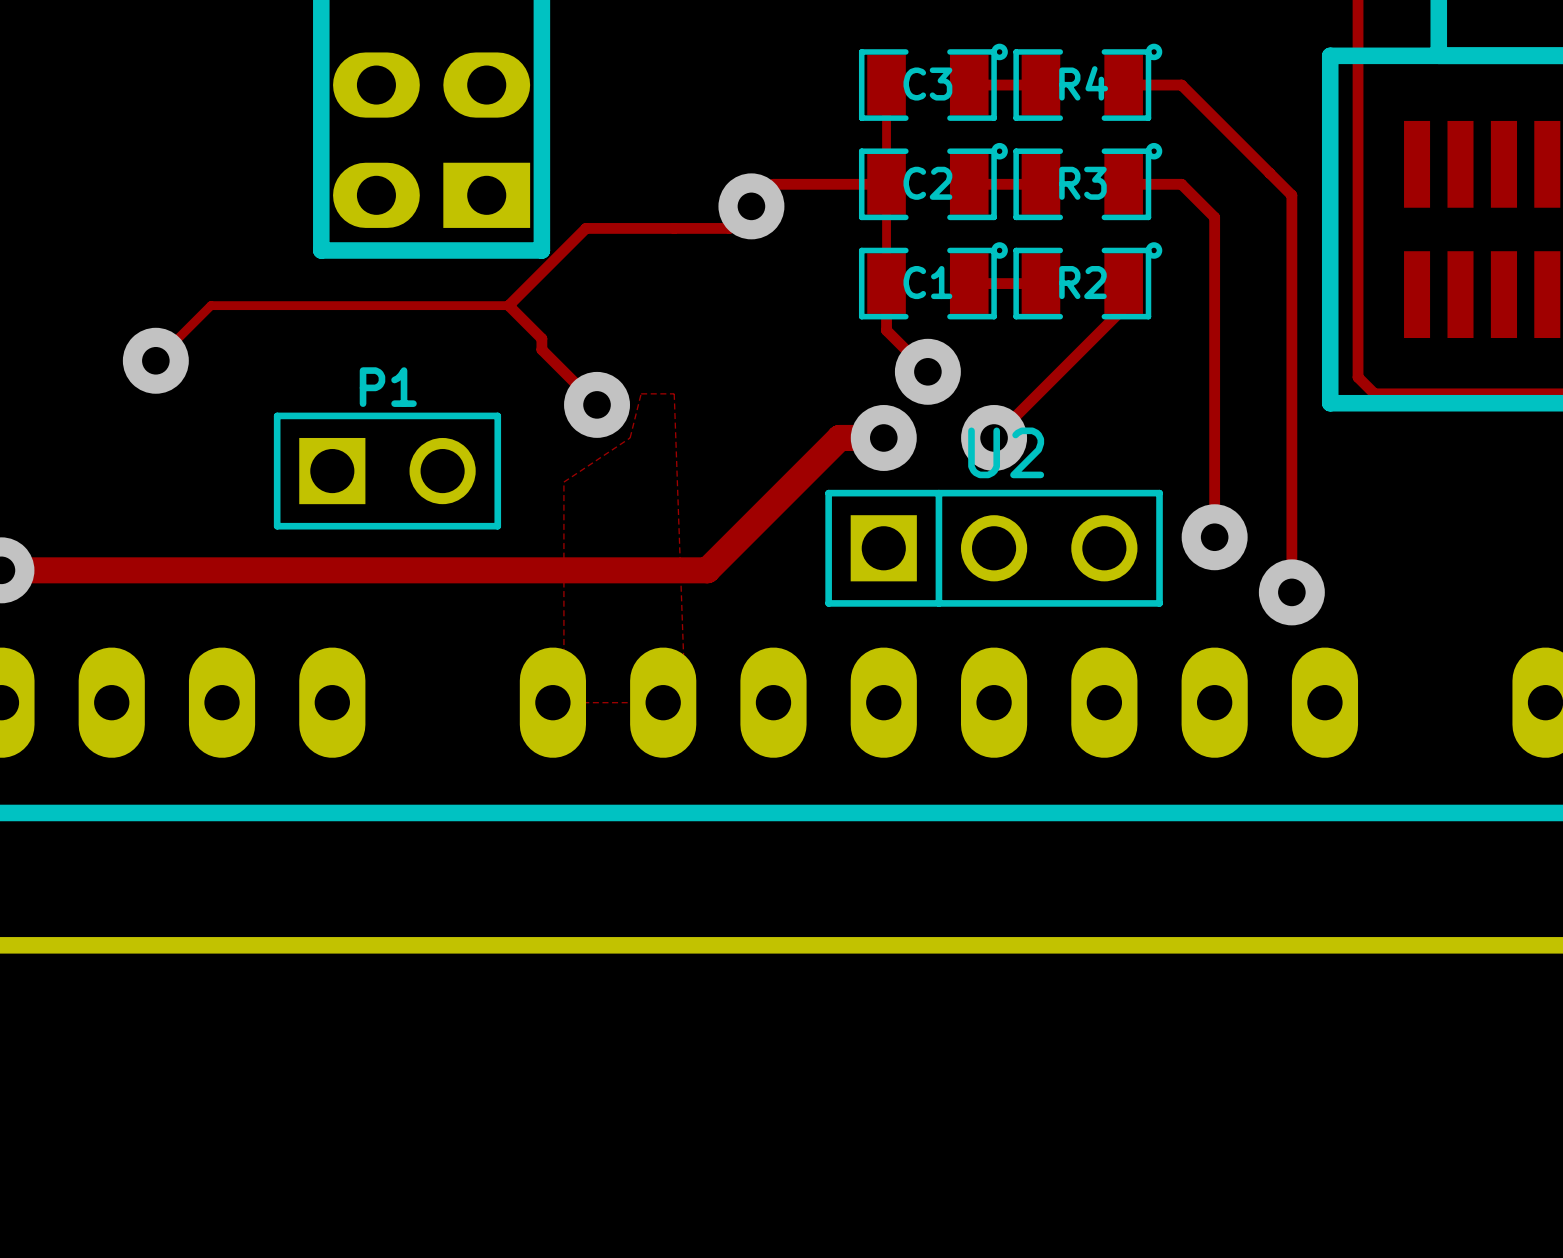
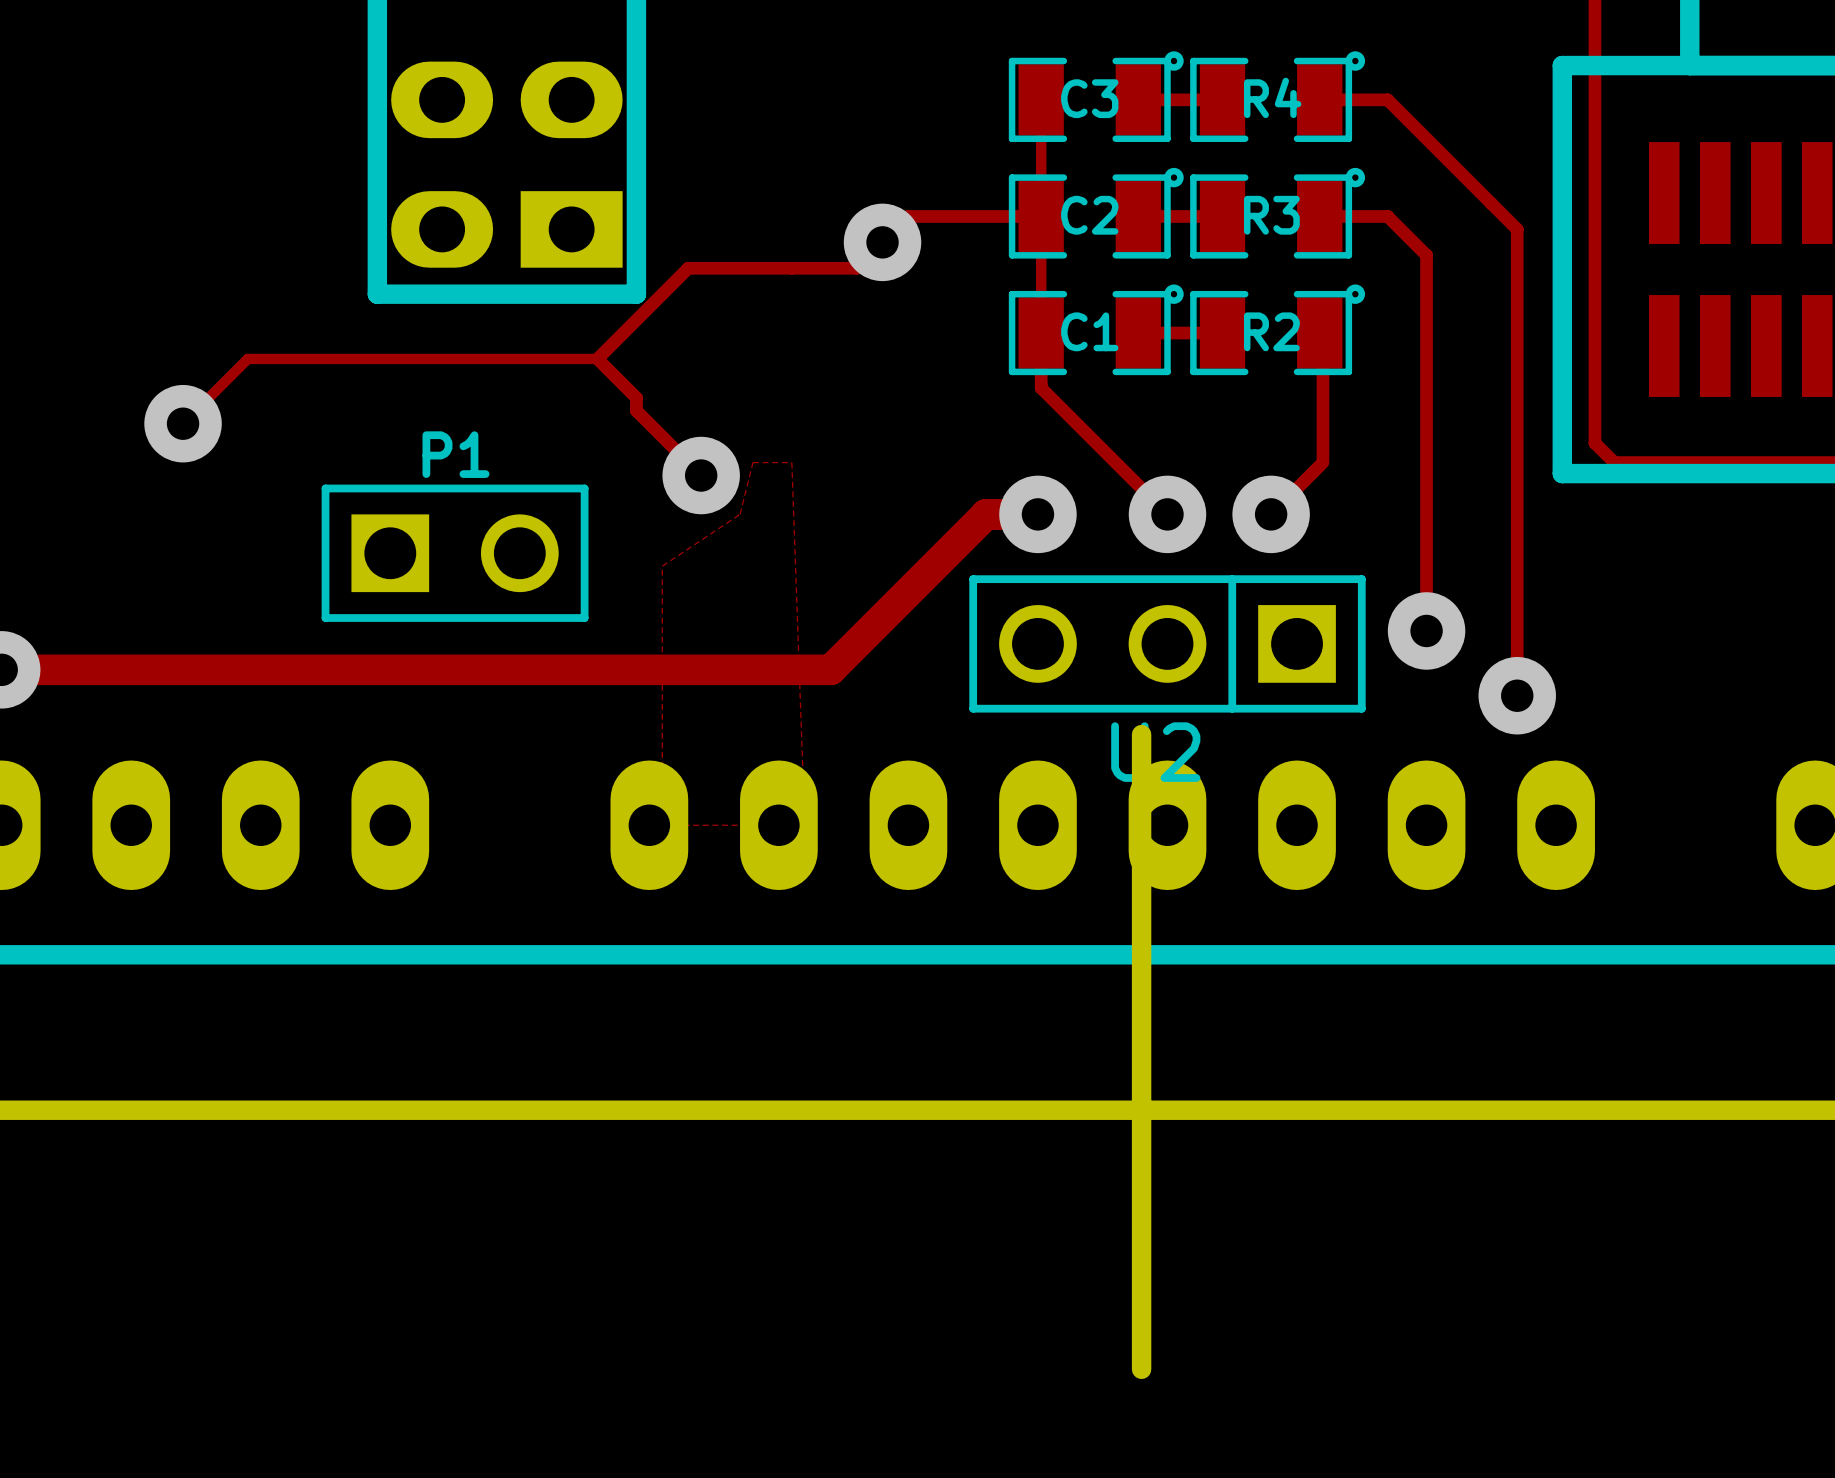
track: (1123, 283) (1123, 308) (994, 437) -> (1089, 436) (1167, 514)
track: none -> (1322, 336) (1322, 462) (1271, 514)
via position: (927, 371) -> (1271, 514)
U2 rotation: 0° (994, 548) -> 180° (1167, 643)
board edge: none -> (1141, 734) (1141, 1369)

